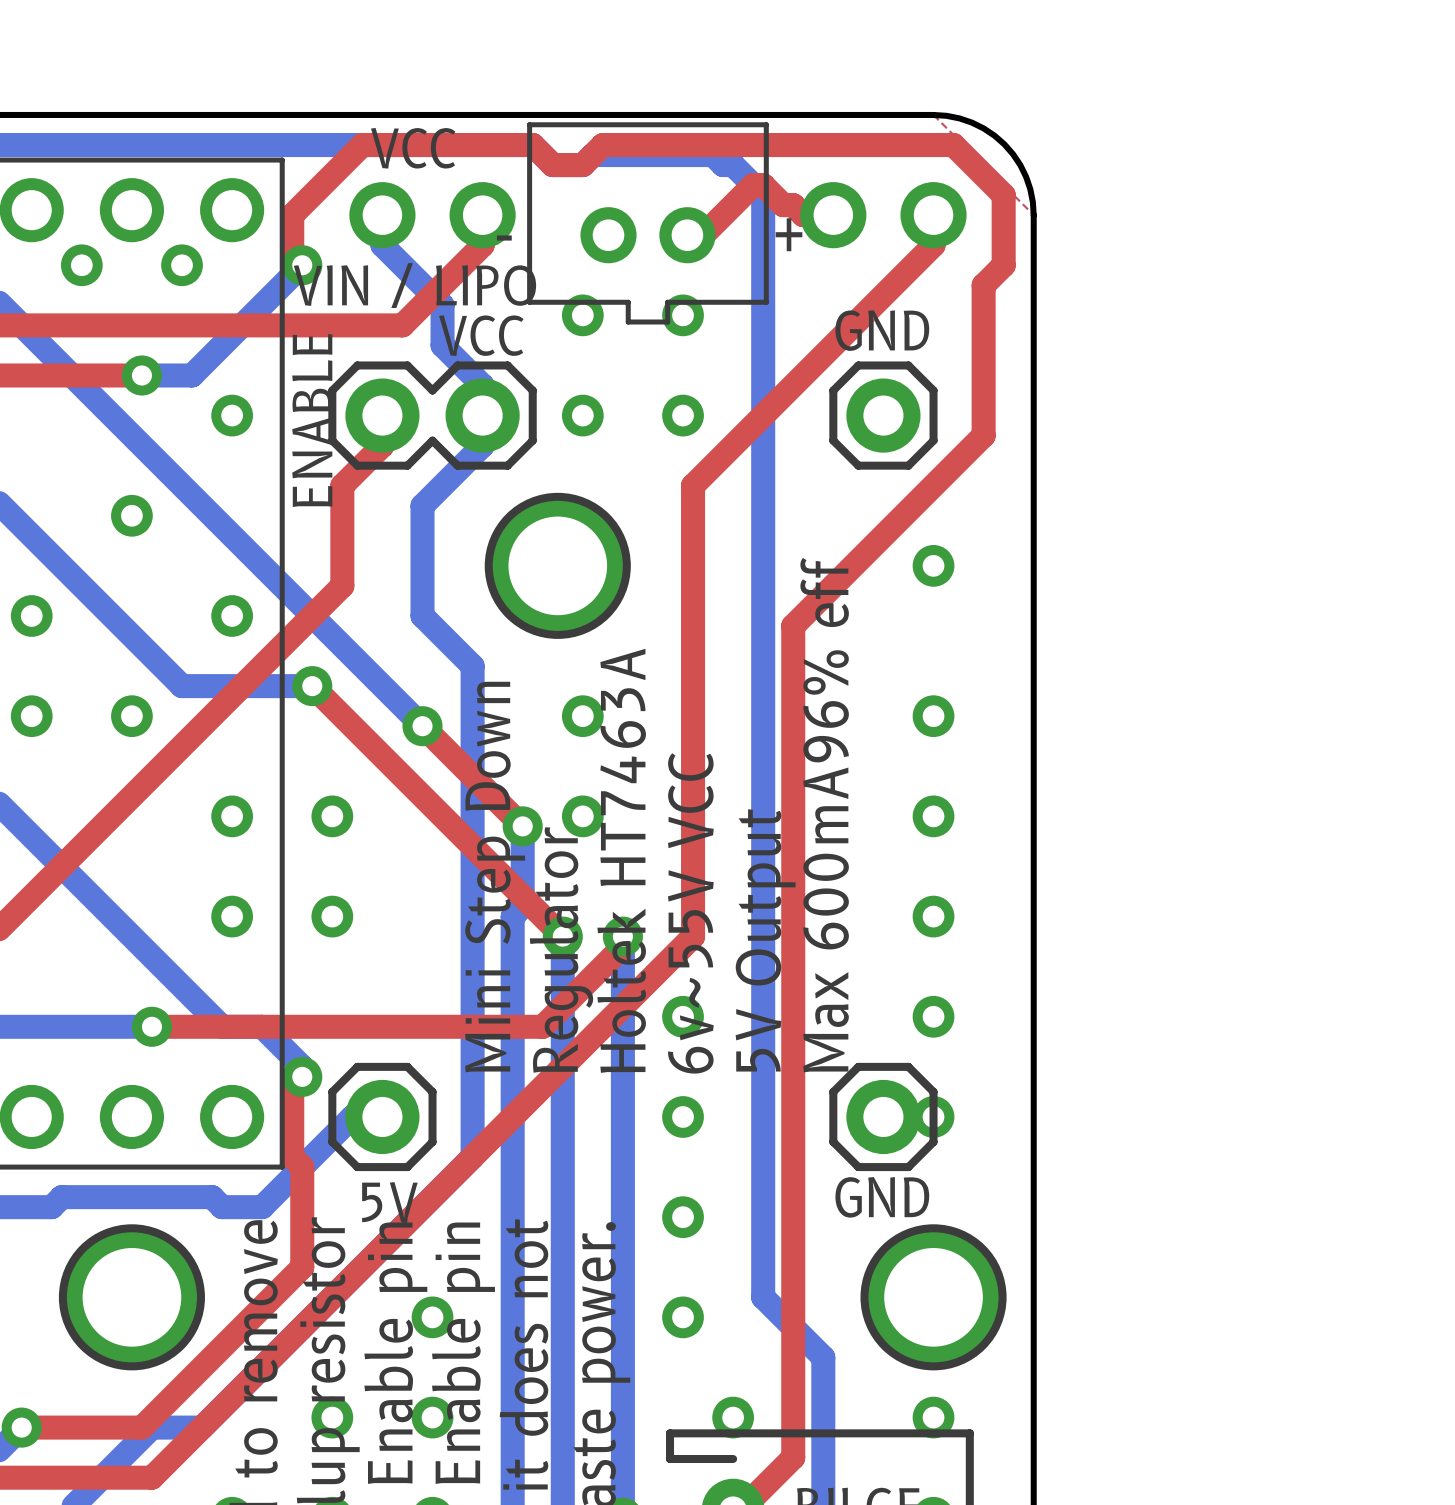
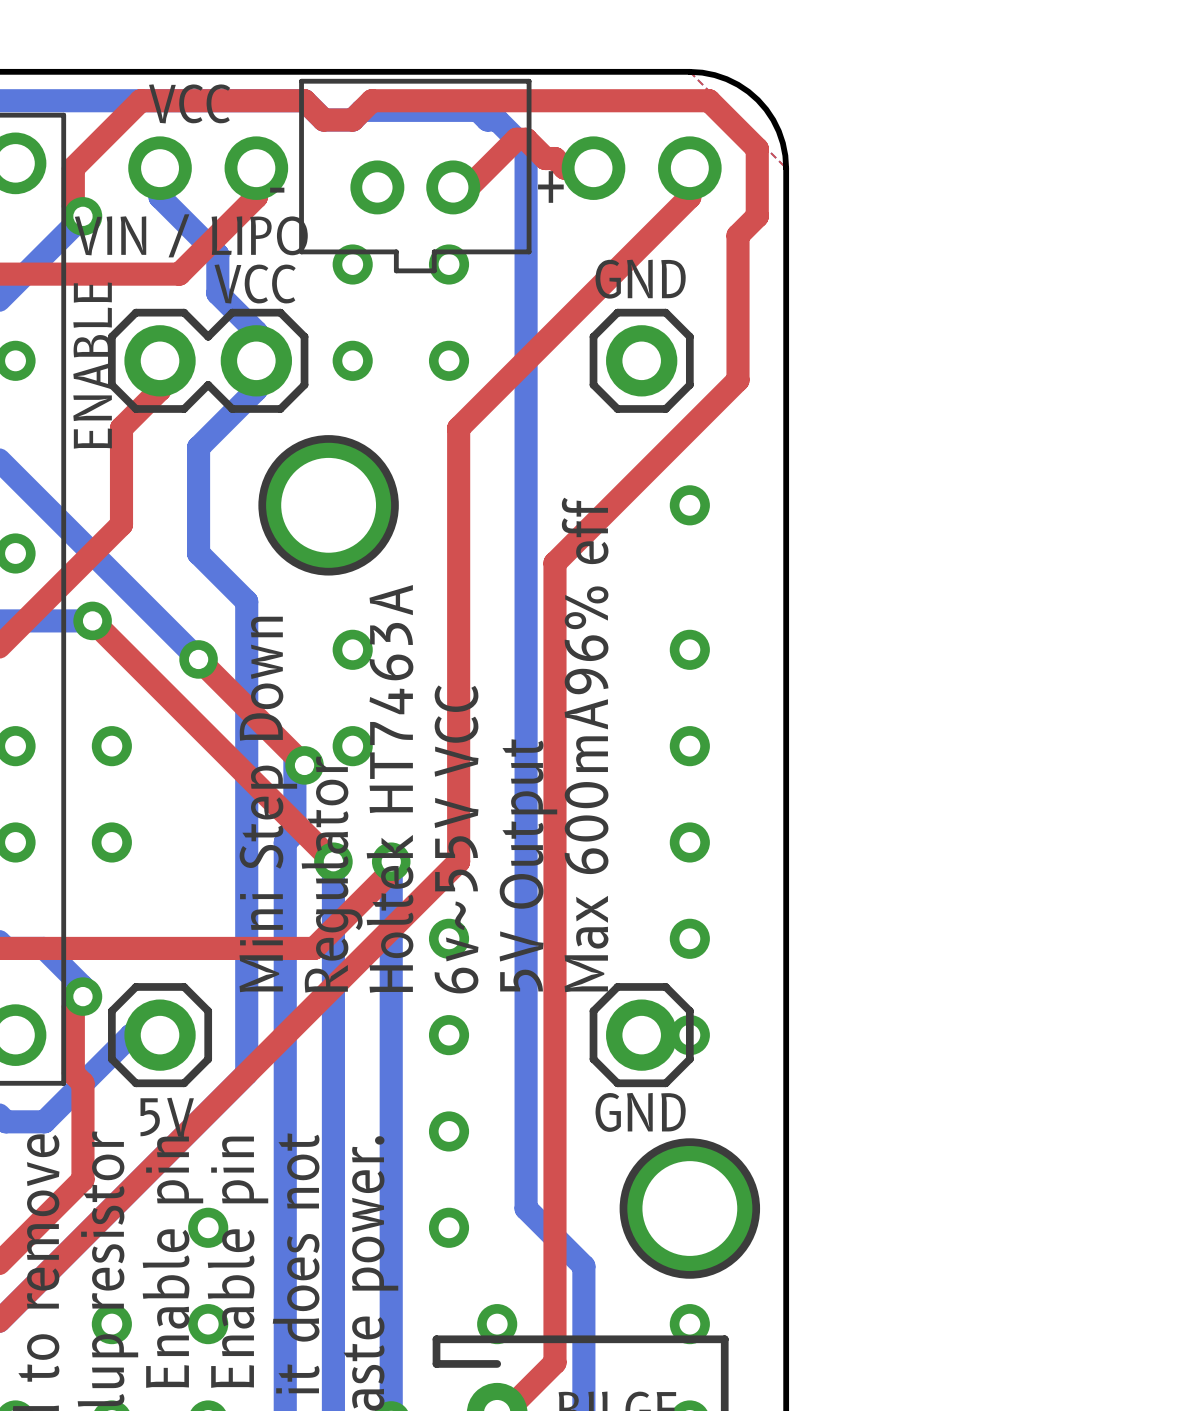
via position: (522, 826) -> (304, 765)

